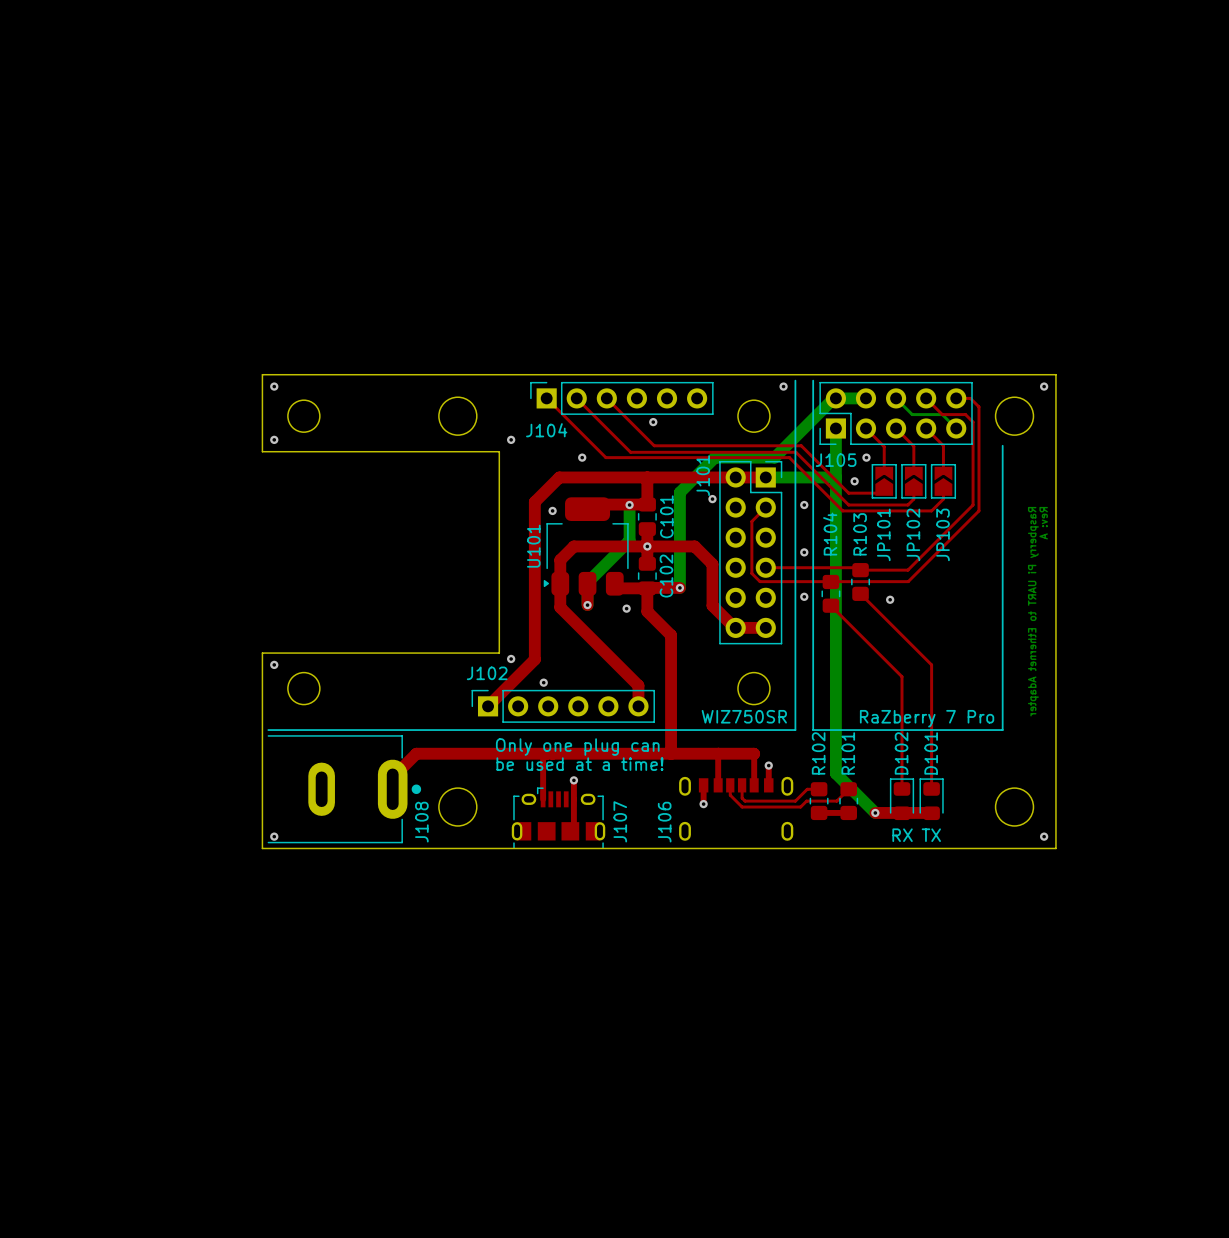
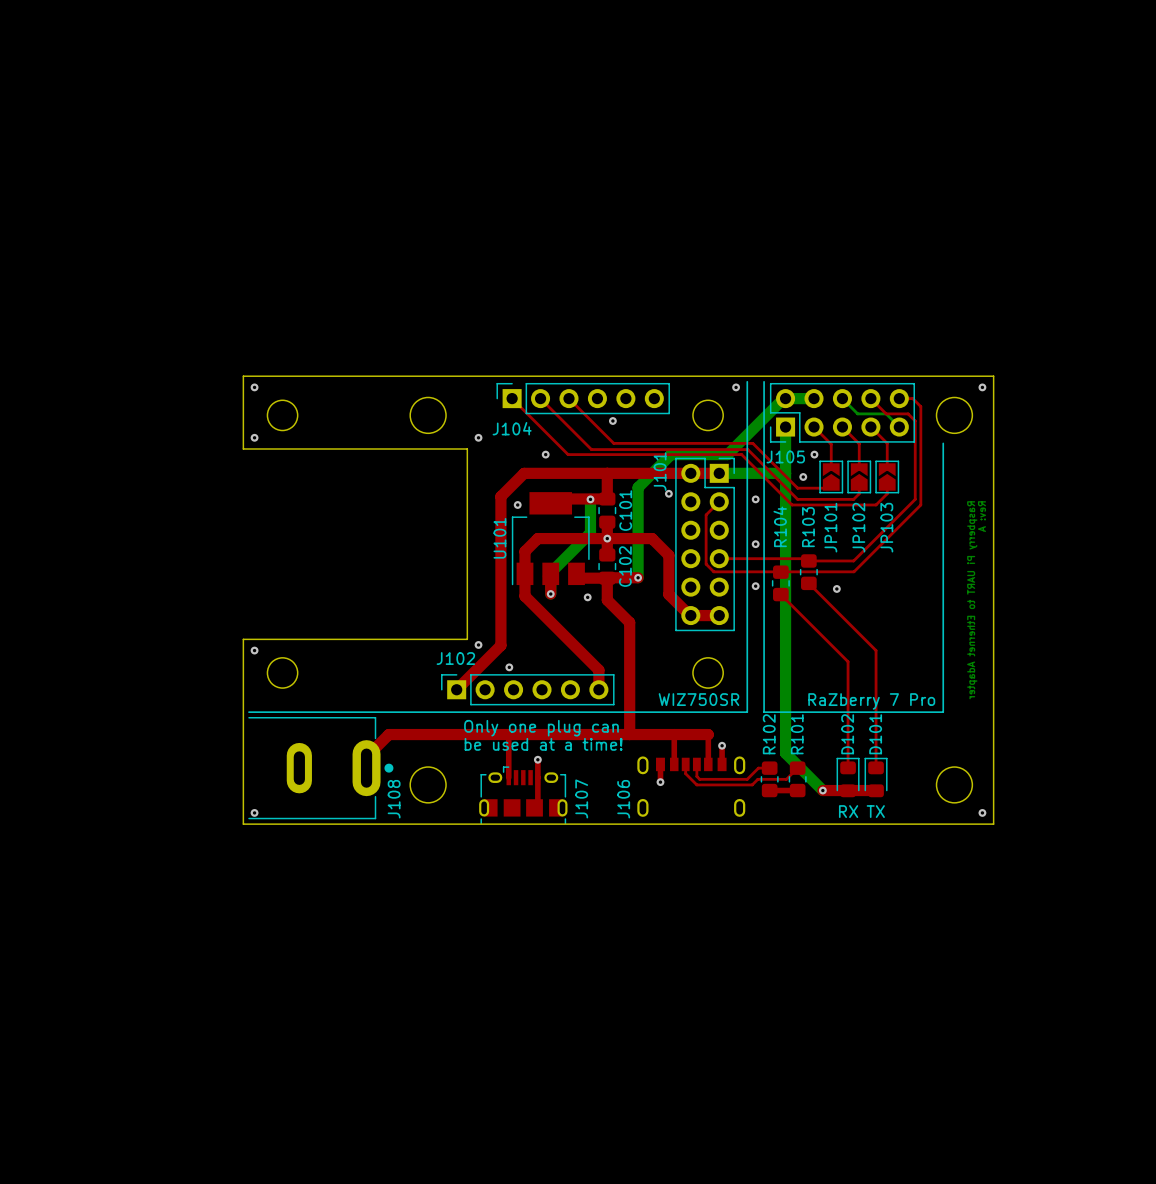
U101 footprint: [543, 497, 629, 596] -> [511, 492, 590, 586]

